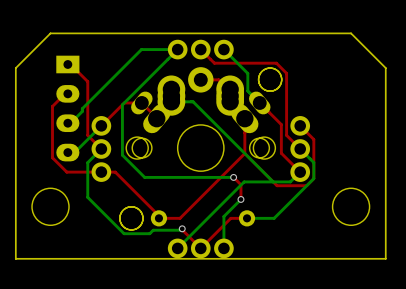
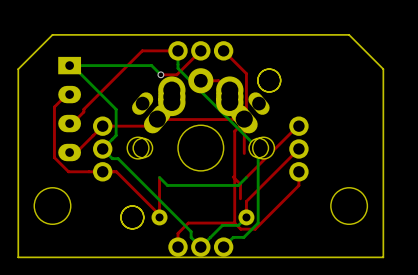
top track: none -> (178, 50) (142, 50) (83, 109) (83, 111) (72, 123) (69, 123)
top track: (200, 49) (214, 63) (276, 63) (286, 73) (286, 135) (300, 148) -> (200, 50) (176, 74) (160, 74)
bottom track: (223, 49) (247, 73) (247, 91) (259, 102) -> none
top track: none -> (223, 50) (246, 73) (246, 119)
bottom track: none -> (69, 65) (151, 65) (160, 74)
top track: (67, 64) (70, 64) (87, 81) (87, 135) (101, 148) -> none
via: none -> (160, 74)
bottom track: (171, 101) (193, 101) (273, 181) -> none
top track: (259, 102) (281, 124) (281, 153) (300, 172) -> (234, 223) (240, 229) (255, 229) (298, 185) (298, 171)
top track: (156, 117) (141, 102) (124, 102) (101, 125) -> none
top track: none -> (246, 119) (159, 119) (152, 126) (102, 126) (76, 152) (69, 152)
top track: none -> (246, 119) (234, 131) (234, 223)
bottom track: (67, 123) (70, 123) (82, 111) (82, 108) (141, 49) (177, 49) (122, 104) (122, 155) (144, 177) (233, 177) -> none
bottom track: (101, 125) (74, 152) (67, 152) -> none
top track: (300, 125) (313, 139) (313, 178) (306, 185) (277, 185) (244, 153) (180, 218) (158, 218) -> (298, 126) (246, 177)
bottom track: (101, 148) (87, 162) (87, 197) (124, 233) (149, 233) (153, 230) (182, 228) -> none
bottom track: (300, 148) (313, 162) (313, 178) (274, 218) (247, 218) -> (72, 65) (116, 109) (116, 135) (102, 148) (112, 158) (118, 158) (191, 231) (191, 237) (200, 247) (222, 225) (238, 225) (246, 217)
bottom track: (300, 172) (290, 181) (244, 181) (177, 248) -> none
top track: none -> (159, 177) (159, 214)
via: (233, 177) -> none
bottom track: none -> (246, 177) (238, 185) (167, 185) (159, 177)
bottom track: (240, 199) (223, 216) (223, 248) -> (178, 50) (178, 68) (258, 148) (258, 223) (243, 237) (233, 237) (223, 247)
via: (240, 199) -> none
top track: (247, 218) (230, 218) (200, 248) (182, 228) -> (246, 217) (246, 201) (298, 148)
top track: none -> (234, 223) (188, 223) (178, 233) (178, 247)
via: (182, 228) -> none

